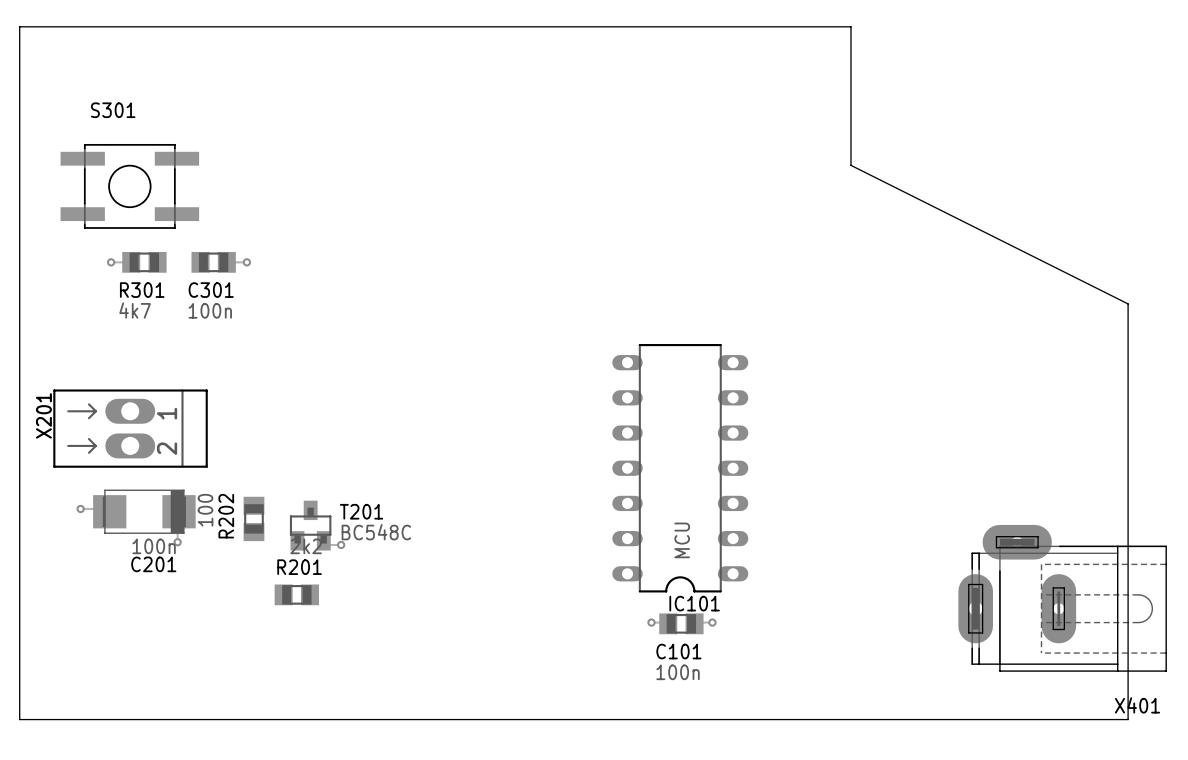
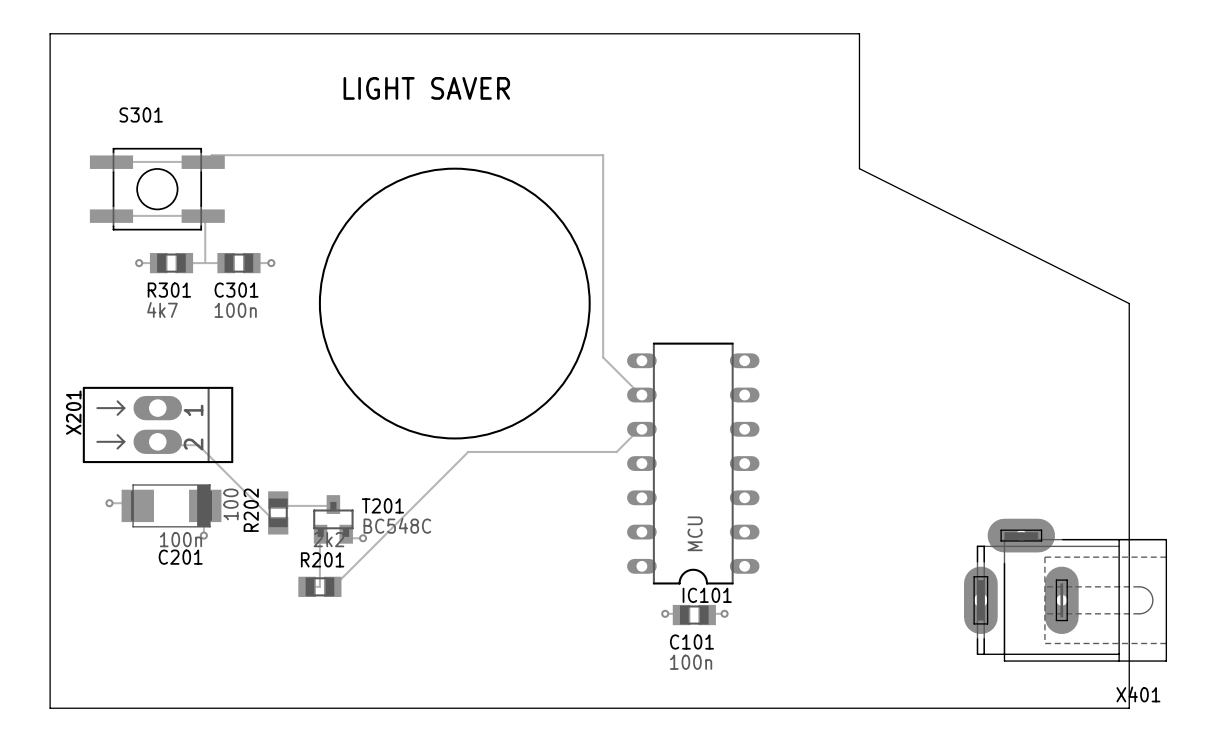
text: none -> LIGHT SAVER (426, 88)
track: none -> (111, 162) (203, 162) (211, 155) (603, 155) (603, 357) (641, 395)
round board edge: none -> [318, 167, 591, 440]
track: none -> (111, 216) (203, 216) (205, 222) (205, 263)
track: none -> (184, 263) (226, 263)
track: none -> (641, 429) (636, 431) (616, 451) (468, 451) (332, 586)
track: none -> (157, 441) (158, 445) (198, 445) (278, 525)
track: none -> (278, 500) (279, 505) (333, 504)
track: none -> (320, 534) (319, 586) (307, 586)

